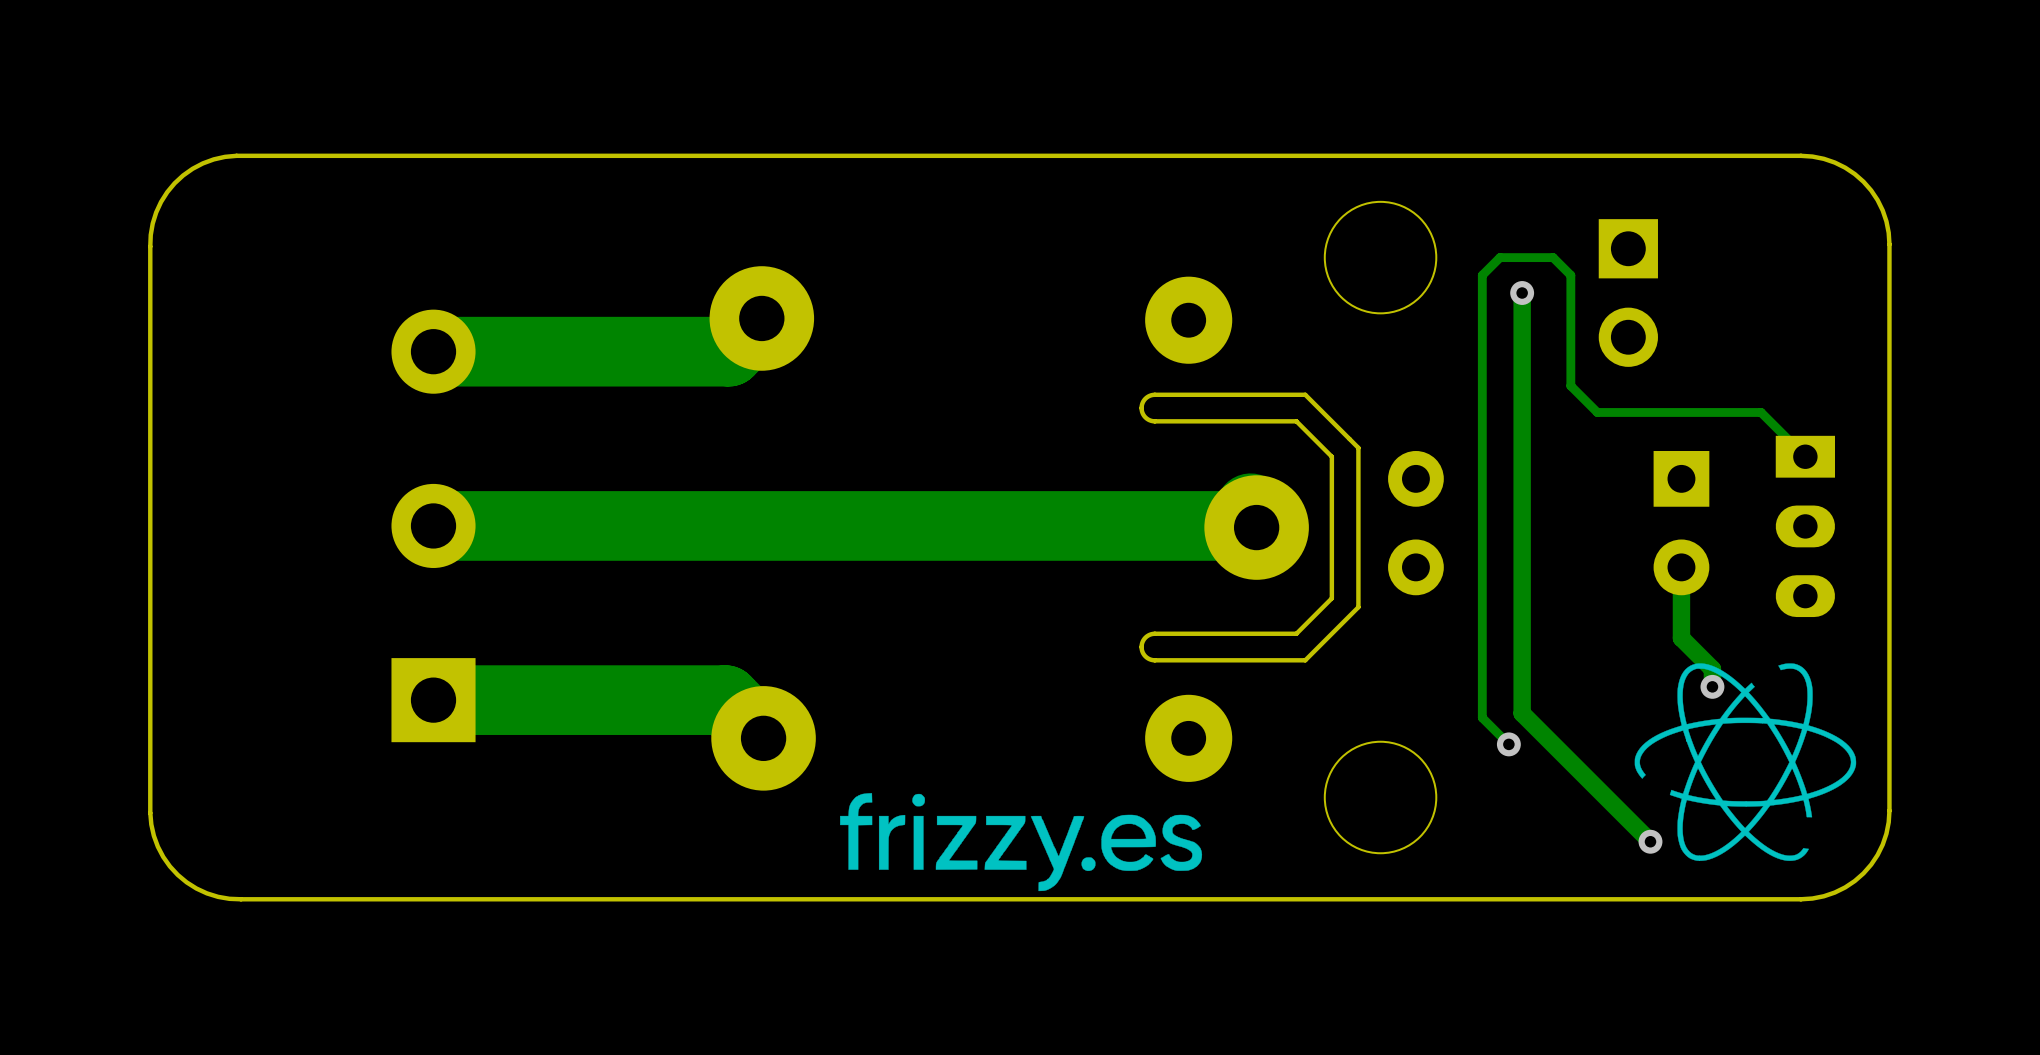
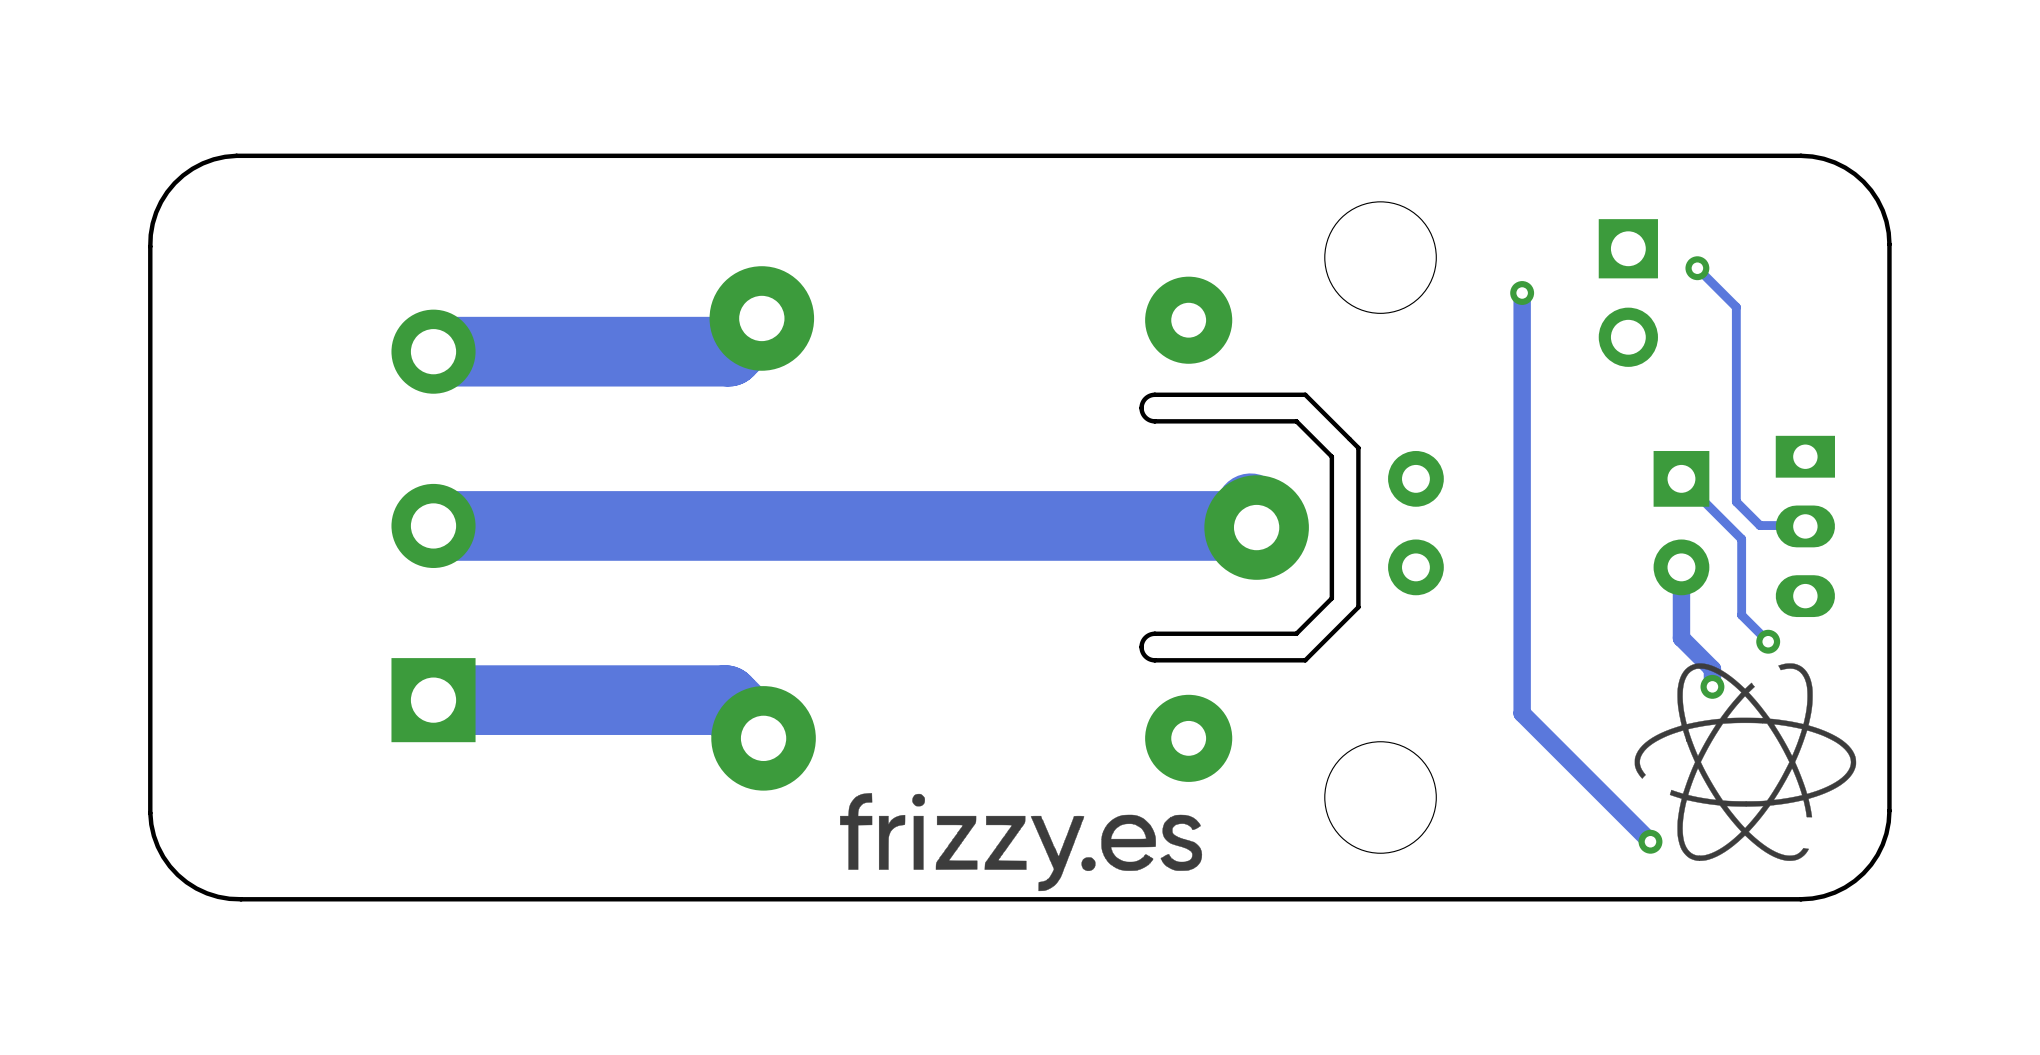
track: none -> (1697, 268) (1736, 307) (1736, 501) (1760, 525) (1805, 525)
via: none -> (1697, 268)
track: (1805, 456) (1761, 412) (1597, 412) (1570, 385) (1570, 275) (1553, 257) (1500, 257) (1482, 275) (1482, 717) (1508, 744) -> none
track: none -> (1681, 478) (1741, 539) (1741, 615) (1768, 641)
via: none -> (1768, 641)
via: (1508, 744) -> none

